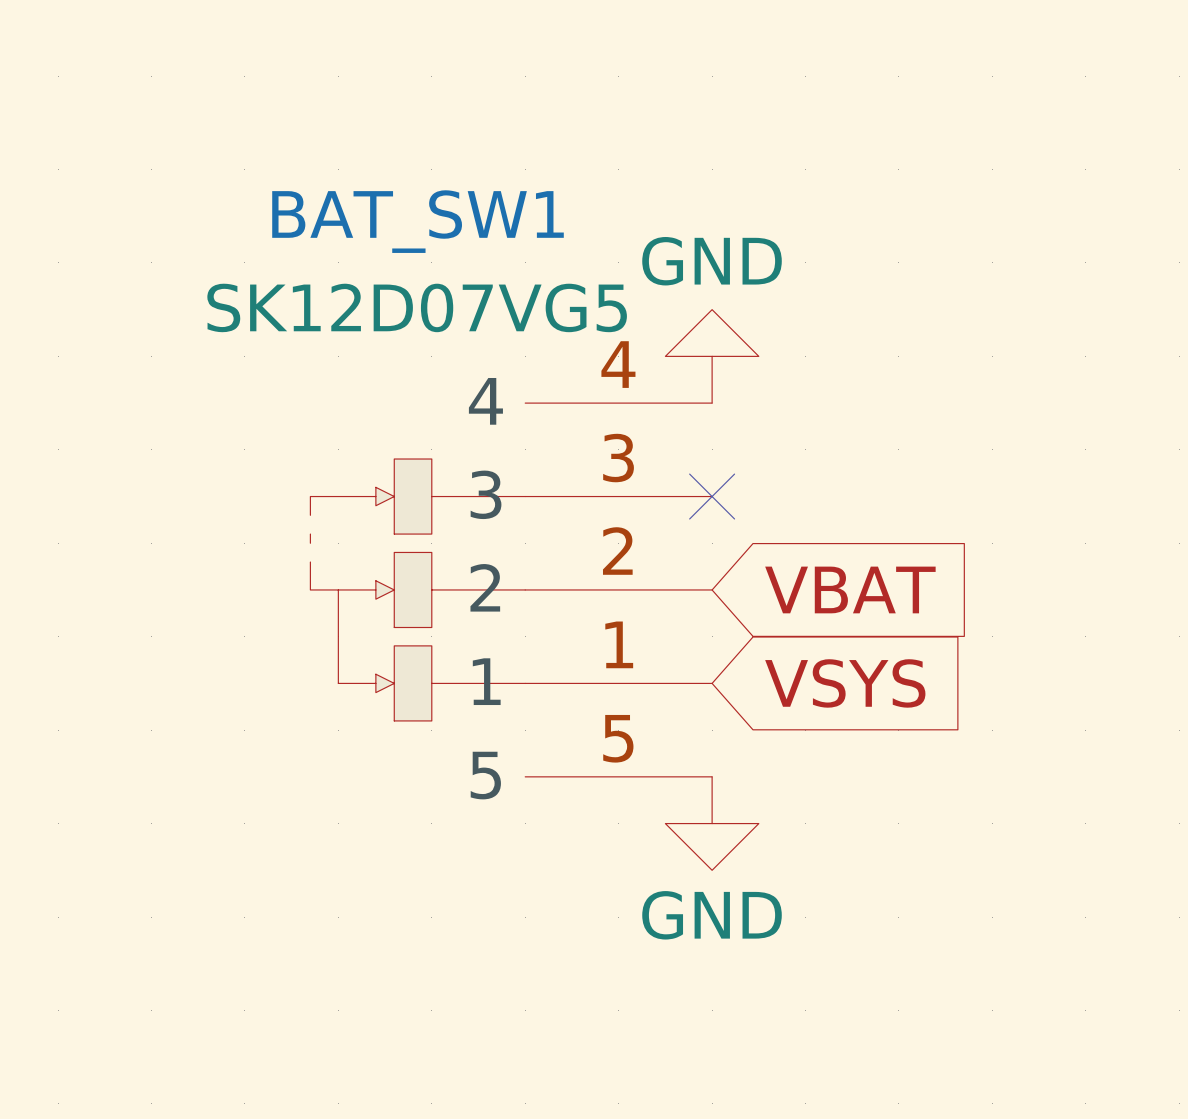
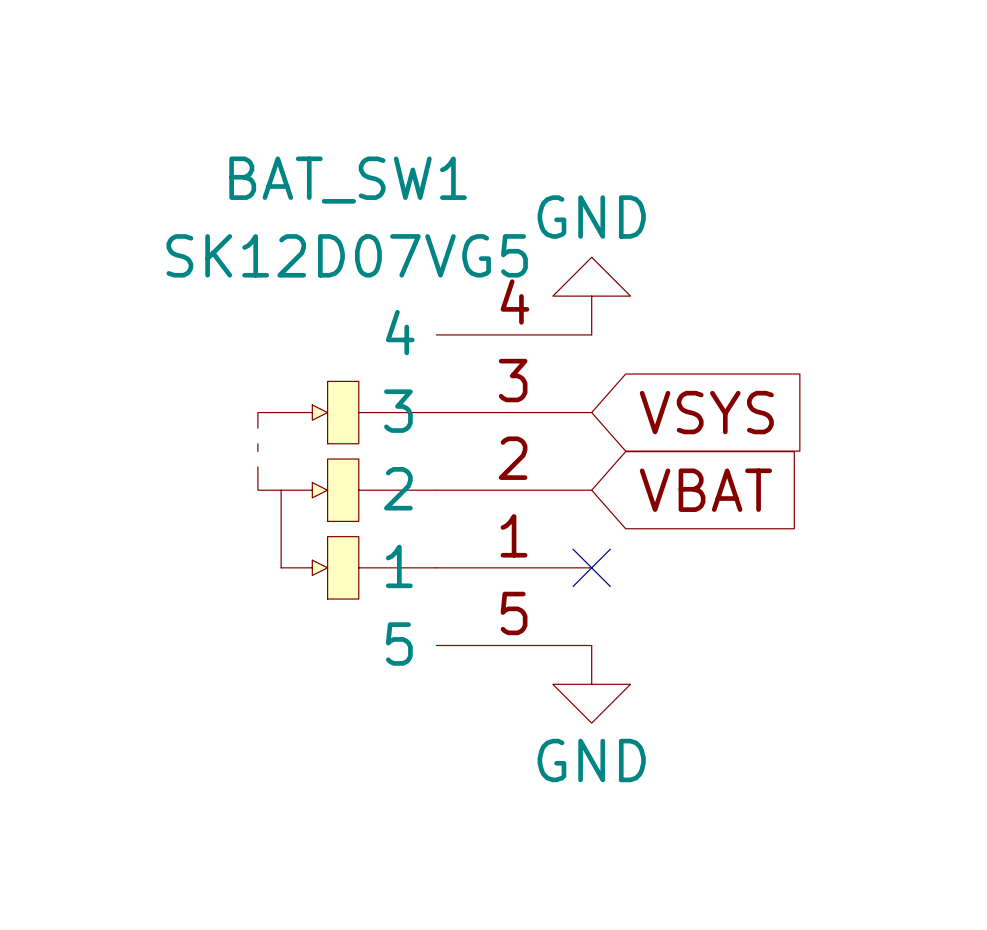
no-connect mark position: (712, 496) -> (591, 567)
global label position: VSYS (845, 683) -> VSYS (706, 412)

